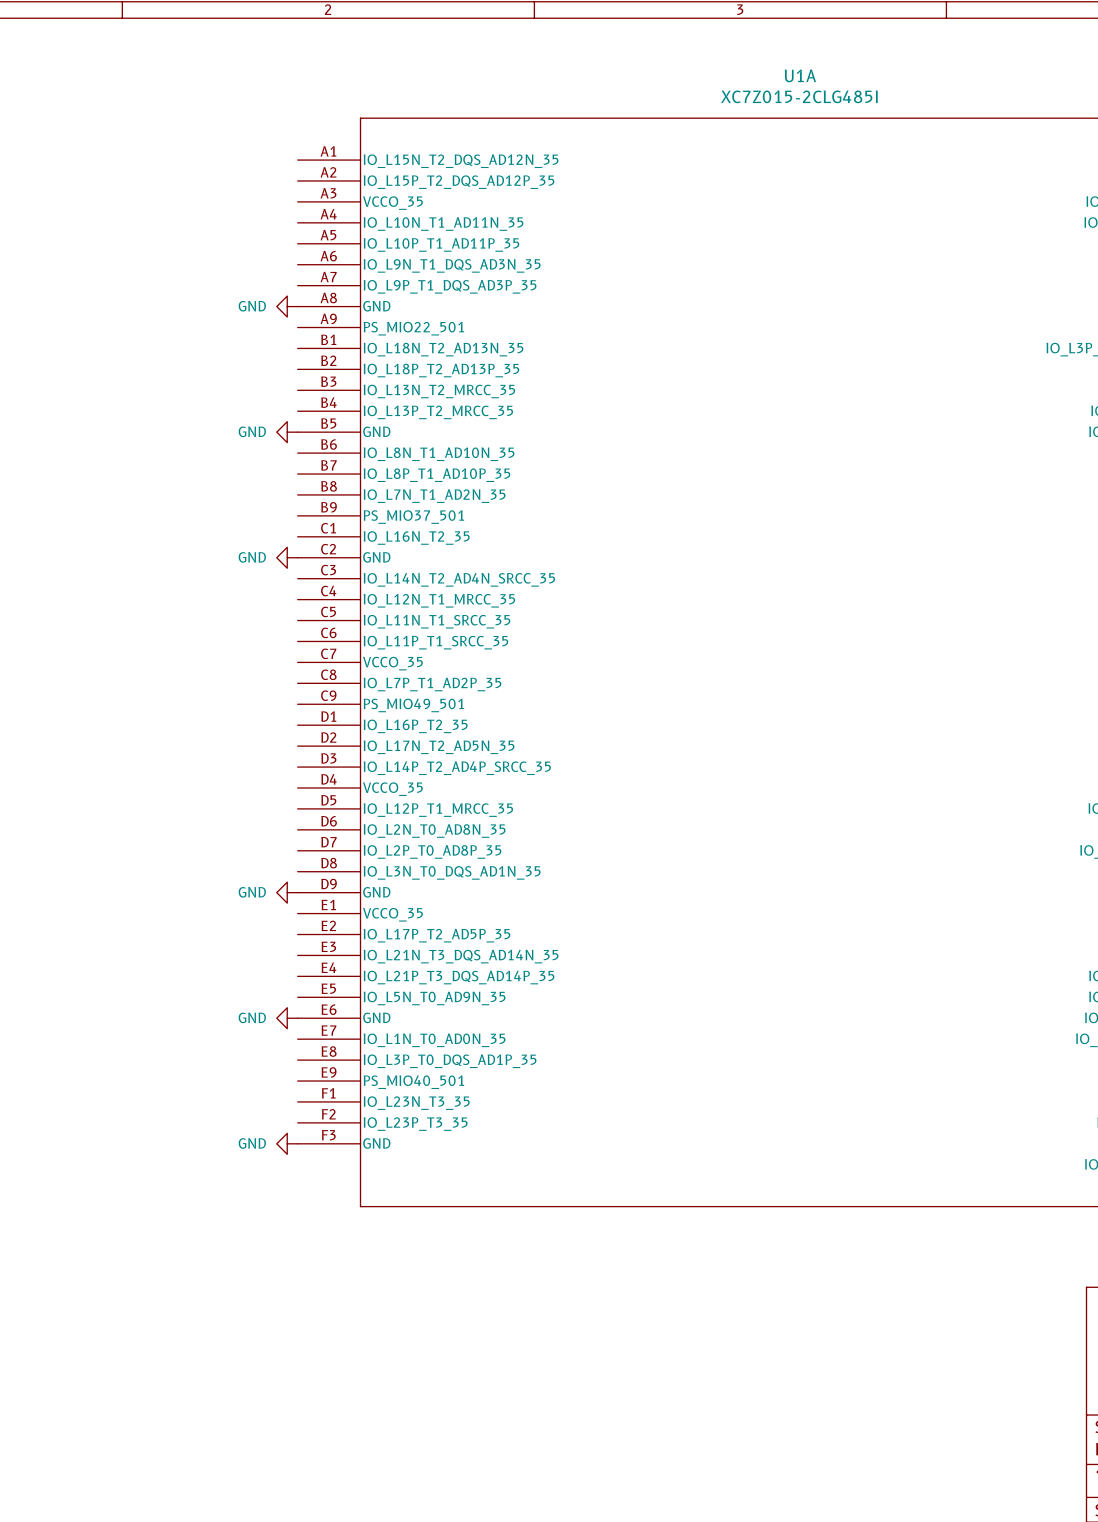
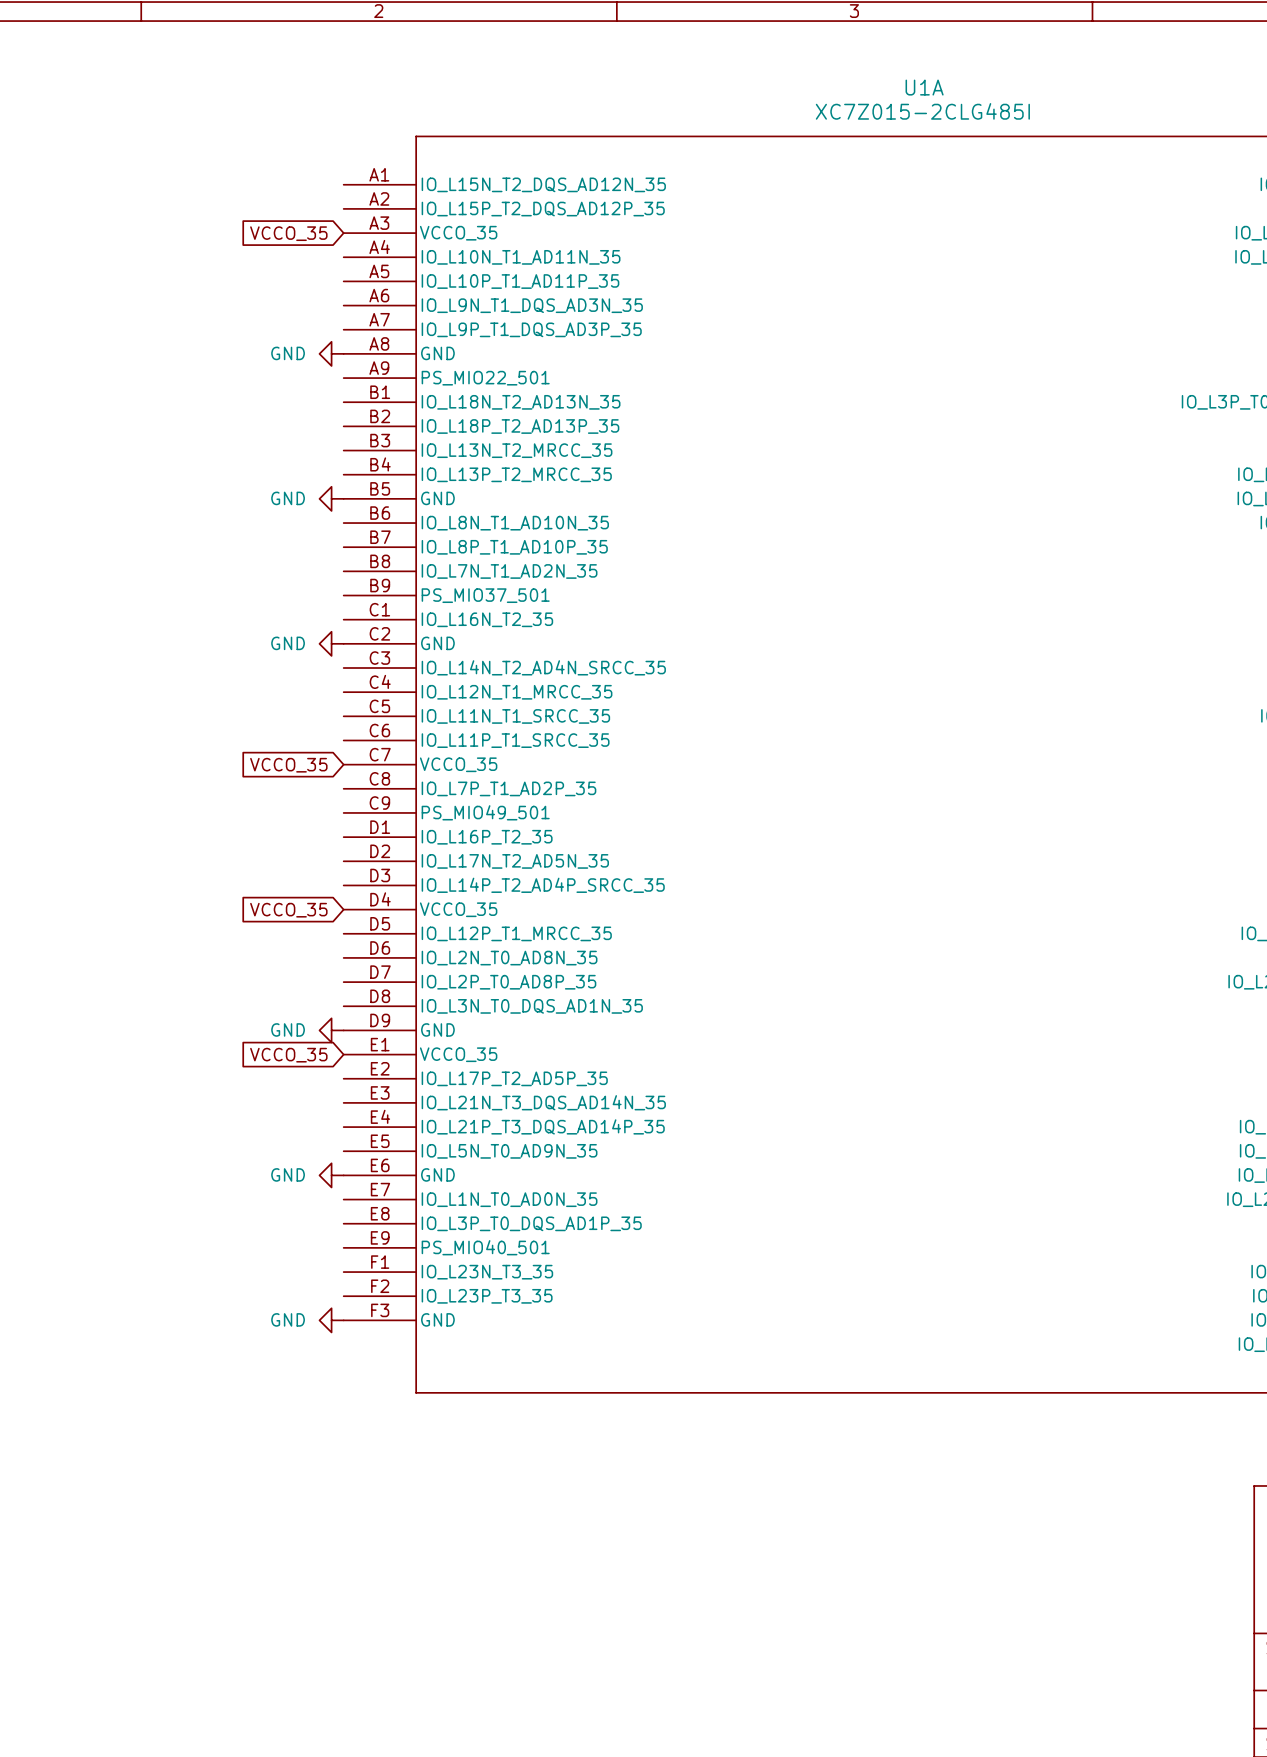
global label: none -> VCCO_35 (288, 233)
global label: none -> VCCO_35 (288, 765)
global label: none -> VCCO_35 (288, 910)
global label: none -> VCCO_35 (288, 1055)

